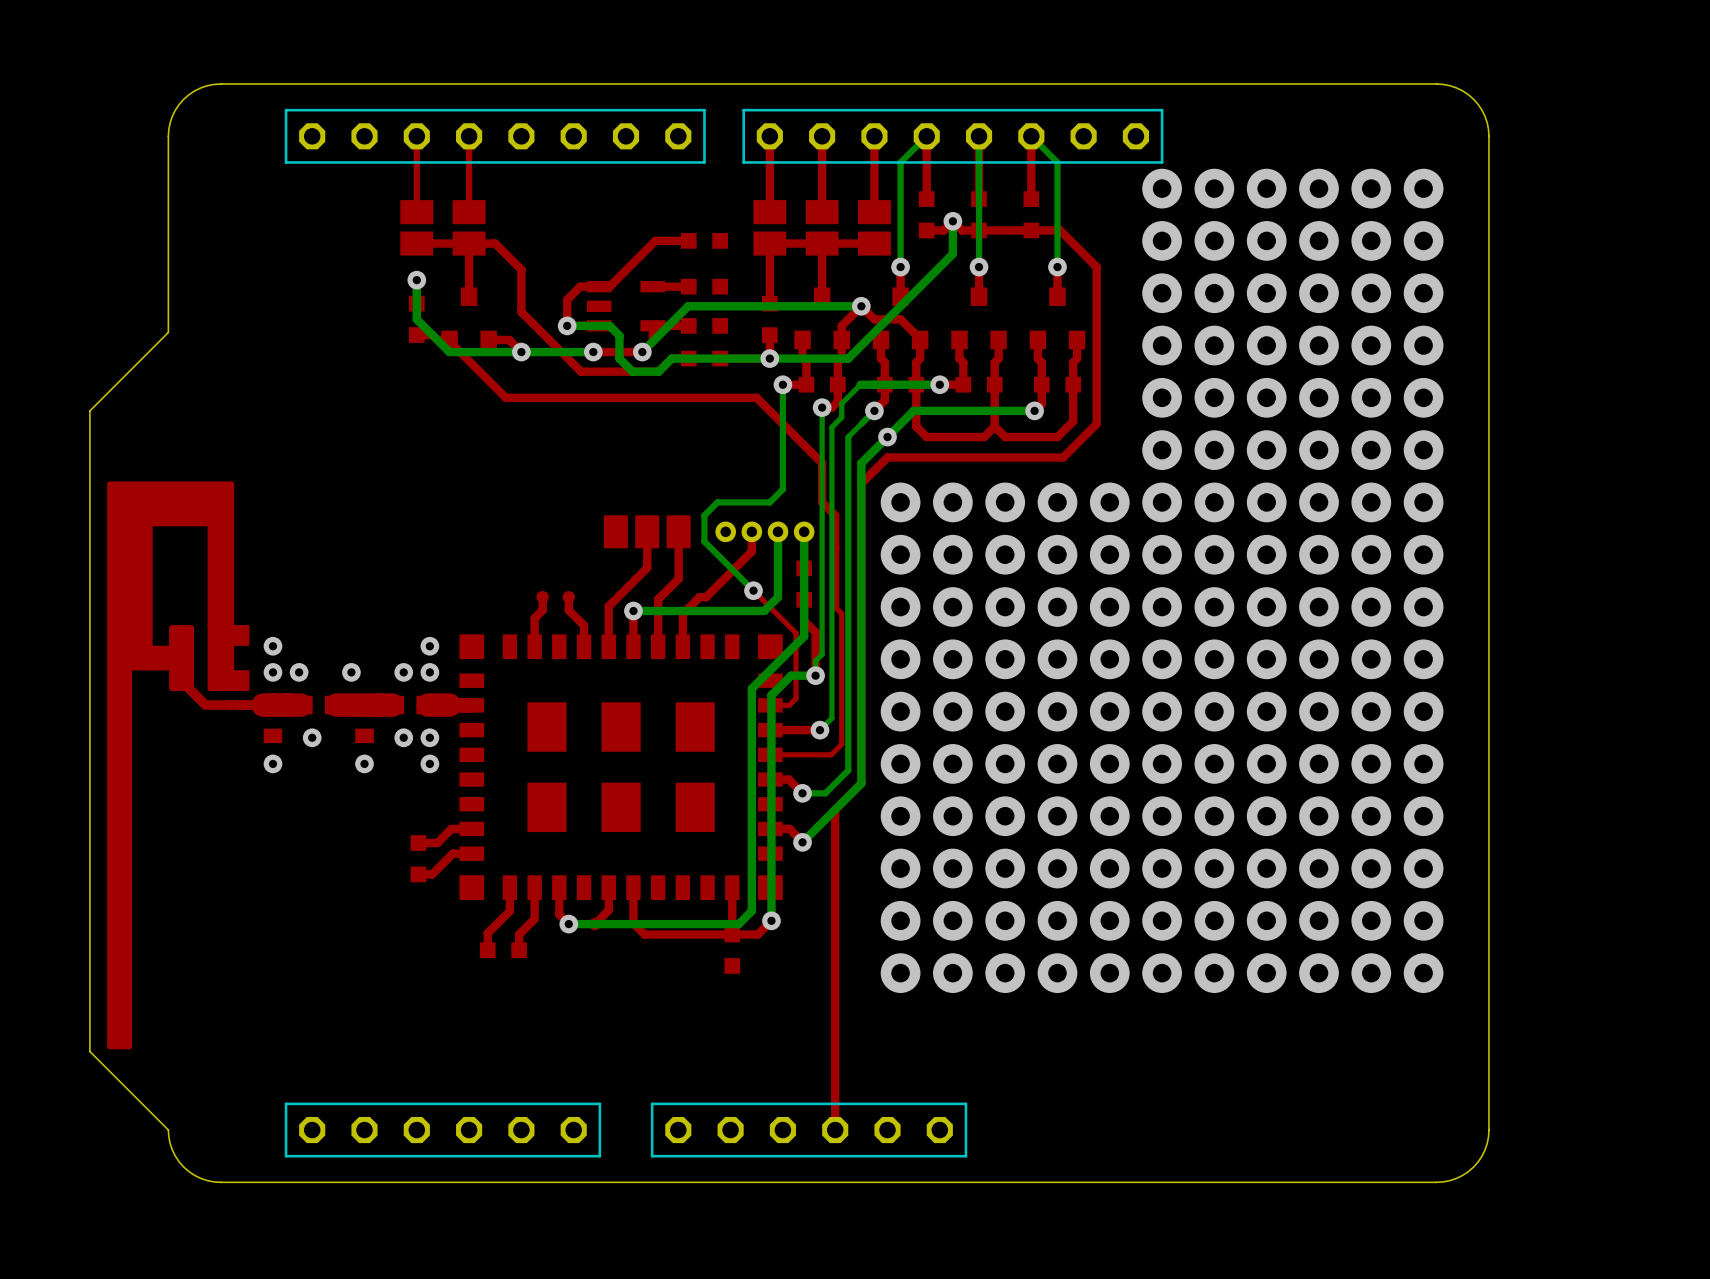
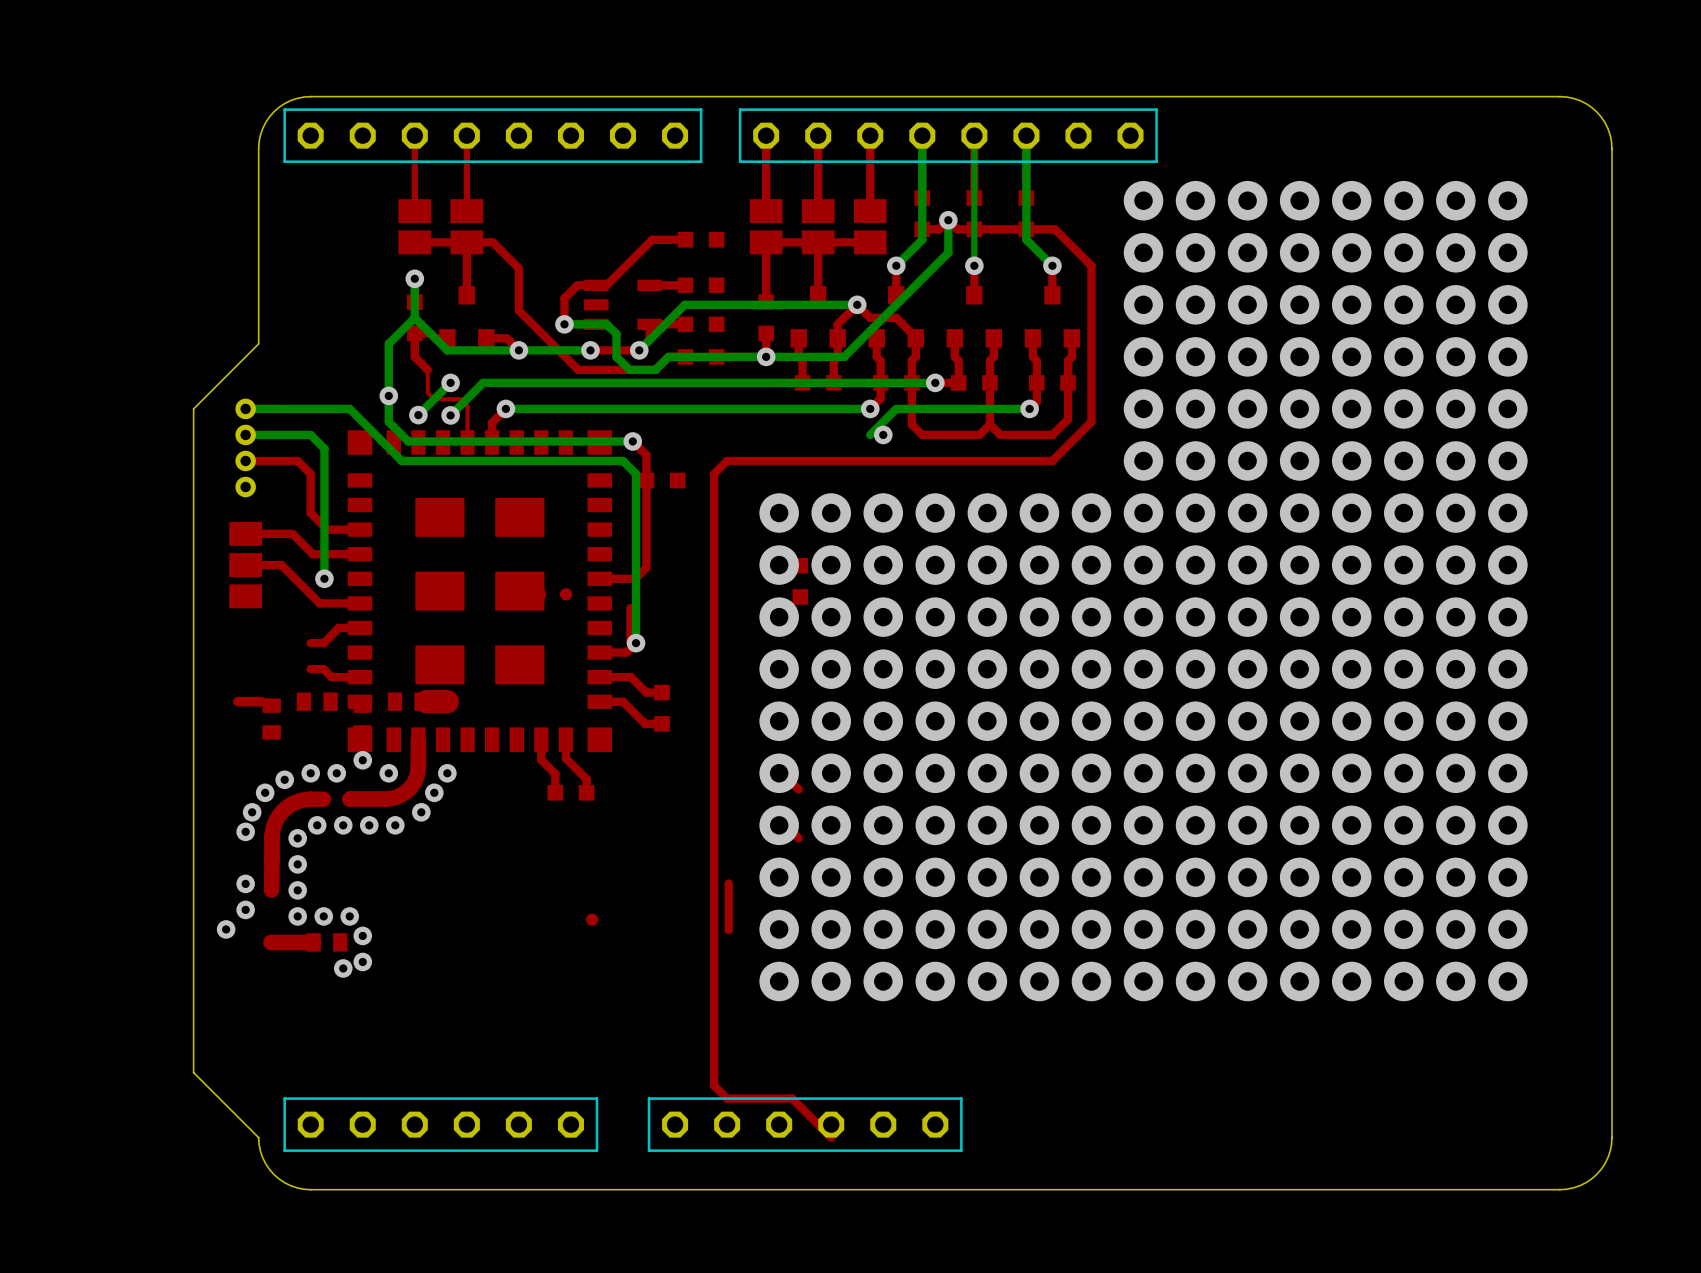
board edge: (1436, 84) (220, 84) (207, 85) (188, 94) (175, 110) (168, 129) (168, 332) (89, 410) (89, 1051) (168, 1130) (172, 1150) (183, 1167) (200, 1178) (213, 1181) (1436, 1182) (1450, 1180) (1468, 1171) (1478, 1161) (1484, 1150) (1488, 1130) (1488, 136) (1484, 116) (1473, 99) (1456, 87) (1436, 84) -> (1559, 96) (1579, 100) (1596, 111) (1608, 128) (1611, 148) (1611, 1137) (1608, 1157) (1601, 1169) (1591, 1178) (1573, 1187) (1559, 1189) (303, 1189) (290, 1185) (273, 1174) (262, 1157) (258, 1137) (193, 1072) (193, 408) (258, 343) (259, 141) (265, 122) (279, 107) (297, 98) (310, 96) (1559, 96)
bottom track: (926, 136) (900, 162) (900, 267) -> (922, 148) (922, 239) (896, 265)
bottom track: (1031, 136) (1057, 162) (1057, 267) -> (1026, 148) (1026, 239) (1052, 265)
via position: (1162, 188) -> (1143, 200)
via position: (1214, 188) -> (1195, 200)
via position: (1266, 188) -> (1247, 200)
via position: (1318, 188) -> (1299, 200)
via position: (1371, 188) -> (1351, 200)
via position: (1423, 188) -> (1403, 200)
via: none -> (1455, 200)
via: none -> (1507, 200)
via position: (1162, 240) -> (1143, 252)
via position: (1214, 240) -> (1195, 252)
via position: (1266, 240) -> (1247, 252)
via position: (1318, 240) -> (1299, 252)
via position: (1371, 240) -> (1351, 252)
via position: (1423, 240) -> (1403, 252)
via: none -> (1455, 252)
via: none -> (1507, 252)
via position: (1162, 293) -> (1143, 304)
via position: (1214, 293) -> (1195, 304)
via position: (1266, 293) -> (1247, 304)
via position: (1318, 293) -> (1299, 304)
via position: (1371, 293) -> (1351, 304)
via position: (1423, 293) -> (1403, 304)
via: none -> (1455, 304)
via: none -> (1507, 304)
bottom track: none -> (414, 317) (388, 343) (388, 421) (408, 441) (632, 441)
top track: none -> (414, 333) (414, 356) (427, 369) (427, 392) (434, 399) (460, 399) (467, 406) (467, 442)
top track: (449, 339) (505, 397) (756, 397) (822, 463) (822, 502) (835, 515) (835, 607) (841, 613) (841, 744) (831, 754) (770, 754) -> none
via position: (1162, 345) -> (1143, 356)
via position: (1214, 345) -> (1195, 356)
via position: (1266, 345) -> (1247, 356)
via position: (1318, 345) -> (1299, 356)
via position: (1371, 345) -> (1351, 356)
via position: (1423, 345) -> (1403, 356)
via: none -> (1455, 356)
via: none -> (1507, 356)
bottom track: none -> (450, 382) (418, 415)
via: none -> (450, 382)
bottom track: (782, 384) (782, 489) (769, 502) (717, 502) (704, 515) (704, 541) (753, 590) -> none
via: (782, 384) -> none
top track: (837, 384) (837, 401) (831, 407) (822, 407) -> none
bottom track: (860, 384) (841, 403) (841, 417) (831, 427) (831, 718) (819, 730) -> (856, 382) (483, 382) (450, 415)
via: none -> (388, 395)
via position: (1162, 397) -> (1143, 408)
via position: (1214, 397) -> (1195, 408)
via position: (1266, 397) -> (1247, 408)
via position: (1318, 397) -> (1299, 408)
via position: (1371, 397) -> (1351, 408)
via position: (1423, 397) -> (1403, 408)
bottom track: (822, 407) (822, 654) (815, 660) (815, 675) (791, 675) (771, 695) (771, 920) -> none
via: (822, 407) -> none
bottom track: none -> (245, 408) (349, 408) (401, 460) (623, 460) (636, 473) (636, 643)
top track: none -> (505, 408) (492, 422) (492, 442)
via: none -> (505, 408)
bottom track: (874, 410) (848, 437) (848, 770) (825, 793) (802, 793) -> (870, 408) (505, 408)
bottom track: (913, 410) (861, 463) (861, 783) (802, 842) -> (909, 408) (896, 408) (870, 434)
via: none -> (1455, 408)
via: none -> (1507, 408)
via: none -> (418, 415)
via: none -> (450, 415)
bottom track: none -> (245, 434) (310, 434) (324, 448) (324, 578)
top track: none -> (632, 441) (646, 455) (646, 567) (635, 578) (599, 578)
via: none -> (632, 441)
part: none -> (245, 447)
via position: (1162, 450) -> (1143, 460)
via position: (1214, 450) -> (1195, 460)
via position: (1266, 450) -> (1247, 460)
via position: (1318, 450) -> (1299, 460)
via position: (1371, 450) -> (1351, 460)
via position: (1423, 450) -> (1403, 460)
top track: (1063, 457) (887, 457) (861, 483) (861, 783) (835, 809) (835, 1130) -> (1058, 455) (1052, 460) (727, 460) (714, 473) (714, 1085) (727, 1098) (792, 1098) (831, 1137)
top track: none -> (245, 460) (297, 460) (310, 473) (310, 513) (327, 529) (359, 529)
via: none -> (1455, 460)
via: none -> (1507, 460)
part: none -> (662, 480)
via position: (900, 502) -> (883, 513)
via position: (952, 502) -> (935, 513)
via position: (1005, 502) -> (987, 513)
via position: (1057, 502) -> (1039, 513)
via position: (1109, 502) -> (1091, 513)
via position: (1162, 502) -> (1143, 513)
via position: (1214, 502) -> (1195, 513)
via position: (1266, 502) -> (1247, 513)
via position: (1318, 502) -> (1299, 513)
via position: (1371, 502) -> (1351, 513)
via position: (1423, 502) -> (1403, 513)
via: none -> (779, 513)
via: none -> (831, 513)
via: none -> (1455, 513)
via: none -> (1507, 513)
top track: (647, 531) (647, 567) (608, 606) (608, 646) -> none
part rotation: 0° (647, 531) -> 90° clockwise (245, 565)
part position: (647, 531) -> (245, 565)
top track: (678, 531) (678, 578) (658, 599) (658, 646) -> none
top track: (751, 531) (751, 551) (706, 597) (699, 597) (682, 613) (682, 646) -> none
part: (764, 531) -> none
bottom track: (778, 531) (778, 597) (764, 611) (633, 611) -> none
bottom track: (804, 531) (804, 636) (751, 688) (751, 911) (738, 924) (568, 924) -> none
top track: none -> (245, 533) (292, 533) (312, 554) (359, 554)
via position: (900, 554) -> (883, 565)
via position: (952, 554) -> (935, 565)
via position: (1005, 554) -> (987, 565)
via position: (1057, 554) -> (1039, 565)
via position: (1109, 554) -> (1091, 565)
via position: (1162, 554) -> (1143, 565)
via position: (1214, 554) -> (1195, 565)
via position: (1266, 554) -> (1247, 565)
via position: (1318, 554) -> (1299, 565)
via position: (1371, 554) -> (1351, 565)
via position: (1423, 554) -> (1403, 565)
top track: none -> (245, 565) (281, 565) (319, 603) (359, 603)
via: none -> (779, 565)
via: none -> (831, 565)
via: none -> (1455, 565)
via: none -> (1507, 565)
via: none -> (324, 578)
top track: (753, 590) (795, 633) (795, 698) (789, 705) (770, 705) -> none
via: (753, 590) -> none
top track: (542, 597) (542, 610) (534, 618) (534, 646) -> none
top track: (568, 597) (568, 610) (584, 625) (584, 646) -> none
top track: (804, 599) (804, 620) (815, 632) (815, 675) -> none
via position: (900, 607) -> (883, 617)
via position: (952, 607) -> (935, 617)
via position: (1005, 607) -> (987, 617)
via position: (1057, 607) -> (1039, 617)
via position: (1109, 607) -> (1091, 617)
via position: (1162, 607) -> (1143, 617)
via position: (1214, 607) -> (1195, 617)
via position: (1266, 607) -> (1247, 617)
via position: (1318, 607) -> (1299, 617)
via position: (1371, 607) -> (1351, 617)
via position: (1423, 607) -> (1403, 617)
via position: (633, 611) -> (636, 643)
via: none -> (779, 617)
via: none -> (831, 617)
via: none -> (1455, 617)
via: none -> (1507, 617)
top track: none -> (359, 627) (338, 627) (323, 643) (310, 643)
via: (272, 646) -> none
via: (429, 646) -> none
top track: none -> (636, 643) (626, 652) (599, 652)
via position: (900, 659) -> (883, 669)
via position: (952, 659) -> (935, 669)
via position: (1005, 659) -> (987, 669)
via position: (1057, 659) -> (1039, 669)
via position: (1109, 659) -> (1091, 669)
via position: (1162, 659) -> (1143, 669)
via position: (1214, 659) -> (1195, 669)
via position: (1266, 659) -> (1247, 669)
via position: (1318, 659) -> (1299, 669)
via position: (1371, 659) -> (1351, 669)
via position: (1423, 659) -> (1403, 669)
via size: [806, 666, 825, 686] -> [811, 649, 852, 689]
via: (272, 672) -> none
via: (299, 672) -> none
top track: none -> (310, 669) (323, 669) (331, 677) (359, 677)
via: (351, 672) -> none
via: (403, 672) -> none
via: (429, 672) -> none
via: none -> (779, 669)
via: none -> (1455, 669)
via: none -> (1507, 669)
top track: none -> (599, 677) (631, 677) (646, 692) (662, 692)
top track: (290, 703) (263, 705) (305, 705) -> none
top track: (396, 705) (336, 705) -> none
top track: none -> (599, 701) (623, 701) (645, 723) (662, 723)
part: none -> (662, 708)
via position: (900, 711) -> (883, 721)
via position: (952, 711) -> (935, 721)
via position: (1005, 711) -> (987, 721)
via position: (1057, 711) -> (1039, 721)
via position: (1109, 711) -> (1091, 721)
via position: (1162, 711) -> (1143, 721)
via position: (1214, 711) -> (1195, 721)
via position: (1266, 711) -> (1247, 721)
via position: (1318, 711) -> (1299, 721)
via position: (1371, 711) -> (1351, 721)
via position: (1423, 711) -> (1403, 721)
via size: [810, 720, 830, 740] -> [811, 701, 852, 742]
via: none -> (779, 721)
via: none -> (1455, 721)
via: none -> (1507, 721)
top track: (819, 730) (770, 730) -> none
via: (312, 737) -> none
via: (403, 737) -> none
via: (429, 737) -> none
top track: none -> (418, 739) (417, 774) (411, 786) (405, 792) (390, 798) (350, 799)
top track: none -> (541, 739) (541, 759) (555, 773) (555, 792)
top track: none -> (565, 739) (565, 758) (586, 779) (586, 792)
via: (272, 763) -> none
via: (429, 763) -> none
via position: (900, 763) -> (883, 773)
via position: (952, 763) -> (935, 773)
via position: (1005, 763) -> (987, 773)
via position: (1057, 763) -> (1039, 773)
via position: (1109, 763) -> (1091, 773)
via position: (1162, 763) -> (1143, 773)
via position: (1214, 763) -> (1195, 773)
via position: (1266, 763) -> (1247, 773)
via position: (1318, 763) -> (1299, 773)
via position: (1371, 763) -> (1351, 773)
via position: (1423, 763) -> (1403, 773)
part: (178, 765) -> none
part rotation: 0° (621, 767) -> 90° clockwise (479, 591)
part position: (621, 767) -> (479, 591)
via: none -> (310, 773)
via: none -> (336, 773)
via: none -> (388, 773)
via: none -> (447, 773)
via: none -> (779, 773)
via: none -> (831, 773)
via: none -> (1455, 773)
via: none -> (1507, 773)
via: none -> (284, 779)
via: (802, 793) -> none
via: none -> (265, 792)
via: none -> (434, 792)
part: none -> (570, 792)
top track: none -> (323, 799) (305, 799) (295, 802) (287, 807) (277, 818) (272, 832) (271, 890)
via: none -> (252, 812)
via: none -> (421, 812)
via position: (900, 816) -> (883, 825)
via position: (952, 816) -> (935, 825)
via position: (1005, 816) -> (987, 825)
via position: (1057, 816) -> (1039, 825)
via position: (1109, 816) -> (1091, 825)
via position: (1162, 816) -> (1143, 825)
via position: (1214, 816) -> (1195, 825)
via position: (1266, 816) -> (1247, 825)
via position: (1318, 816) -> (1299, 825)
via position: (1371, 816) -> (1351, 825)
via position: (1423, 816) -> (1403, 825)
top track: (471, 828) (451, 828) (437, 843) (418, 843) -> none
via: none -> (317, 825)
via: none -> (343, 825)
via: none -> (369, 825)
via: none -> (395, 825)
via: none -> (779, 825)
via: none -> (831, 825)
via: none -> (1455, 825)
via: none -> (1507, 825)
via: none -> (245, 831)
via: none -> (297, 838)
via: (802, 842) -> none
top track: (471, 853) (452, 853) (432, 874) (418, 874) -> none
part: (418, 858) -> none
via: none -> (297, 864)
via position: (900, 868) -> (883, 877)
via position: (952, 868) -> (935, 877)
via position: (1005, 868) -> (987, 877)
via position: (1057, 868) -> (1039, 877)
via position: (1109, 868) -> (1091, 877)
via position: (1162, 868) -> (1143, 877)
via position: (1214, 868) -> (1195, 877)
via position: (1266, 868) -> (1247, 877)
via position: (1318, 868) -> (1299, 877)
via position: (1371, 868) -> (1351, 877)
via position: (1423, 868) -> (1403, 877)
via: none -> (779, 877)
via: none -> (831, 877)
via: none -> (1455, 877)
via: none -> (1507, 877)
top track: (509, 887) (509, 911) (487, 933) (487, 950) -> none
top track: (534, 887) (534, 919) (519, 934) (519, 950) -> none
top track: (559, 887) (559, 914) (568, 924) -> none
top track: (608, 887) (608, 910) (594, 924) -> none
top track: (633, 887) (633, 923) (644, 934) (757, 934) (771, 920) -> none
via: none -> (245, 883)
via: none -> (297, 890)
via size: [762, 911, 781, 931] -> [759, 909, 799, 950]
via: none -> (245, 909)
via: none -> (297, 916)
via: none -> (323, 916)
via: none -> (349, 916)
via position: (900, 920) -> (883, 929)
via position: (952, 920) -> (935, 929)
via position: (1005, 920) -> (987, 929)
via position: (1057, 920) -> (1039, 929)
via position: (1109, 920) -> (1091, 929)
via position: (1162, 920) -> (1143, 929)
via position: (1214, 920) -> (1195, 929)
via position: (1266, 920) -> (1247, 929)
via position: (1318, 920) -> (1299, 929)
via position: (1371, 920) -> (1351, 929)
via position: (1423, 920) -> (1403, 929)
via: (568, 924) -> none
via: none -> (226, 929)
via: none -> (831, 929)
via: none -> (1455, 929)
via: none -> (1507, 929)
via: none -> (362, 935)
top track: none -> (313, 942) (271, 942) (271, 943) (284, 942)
part: none -> (326, 942)
part: (503, 950) -> none
part: (732, 950) -> none
via: none -> (362, 961)
via: none -> (343, 968)
via position: (900, 973) -> (883, 981)
via position: (952, 973) -> (935, 981)
via position: (1005, 973) -> (987, 981)
via position: (1057, 973) -> (1039, 981)
via position: (1109, 973) -> (1091, 981)
via position: (1162, 973) -> (1143, 981)
via position: (1214, 973) -> (1195, 981)
via position: (1266, 973) -> (1247, 981)
via position: (1318, 973) -> (1299, 981)
via position: (1371, 973) -> (1351, 981)
via position: (1423, 973) -> (1403, 981)
via: none -> (779, 981)
via: none -> (831, 981)
via: none -> (1455, 981)
via: none -> (1507, 981)

